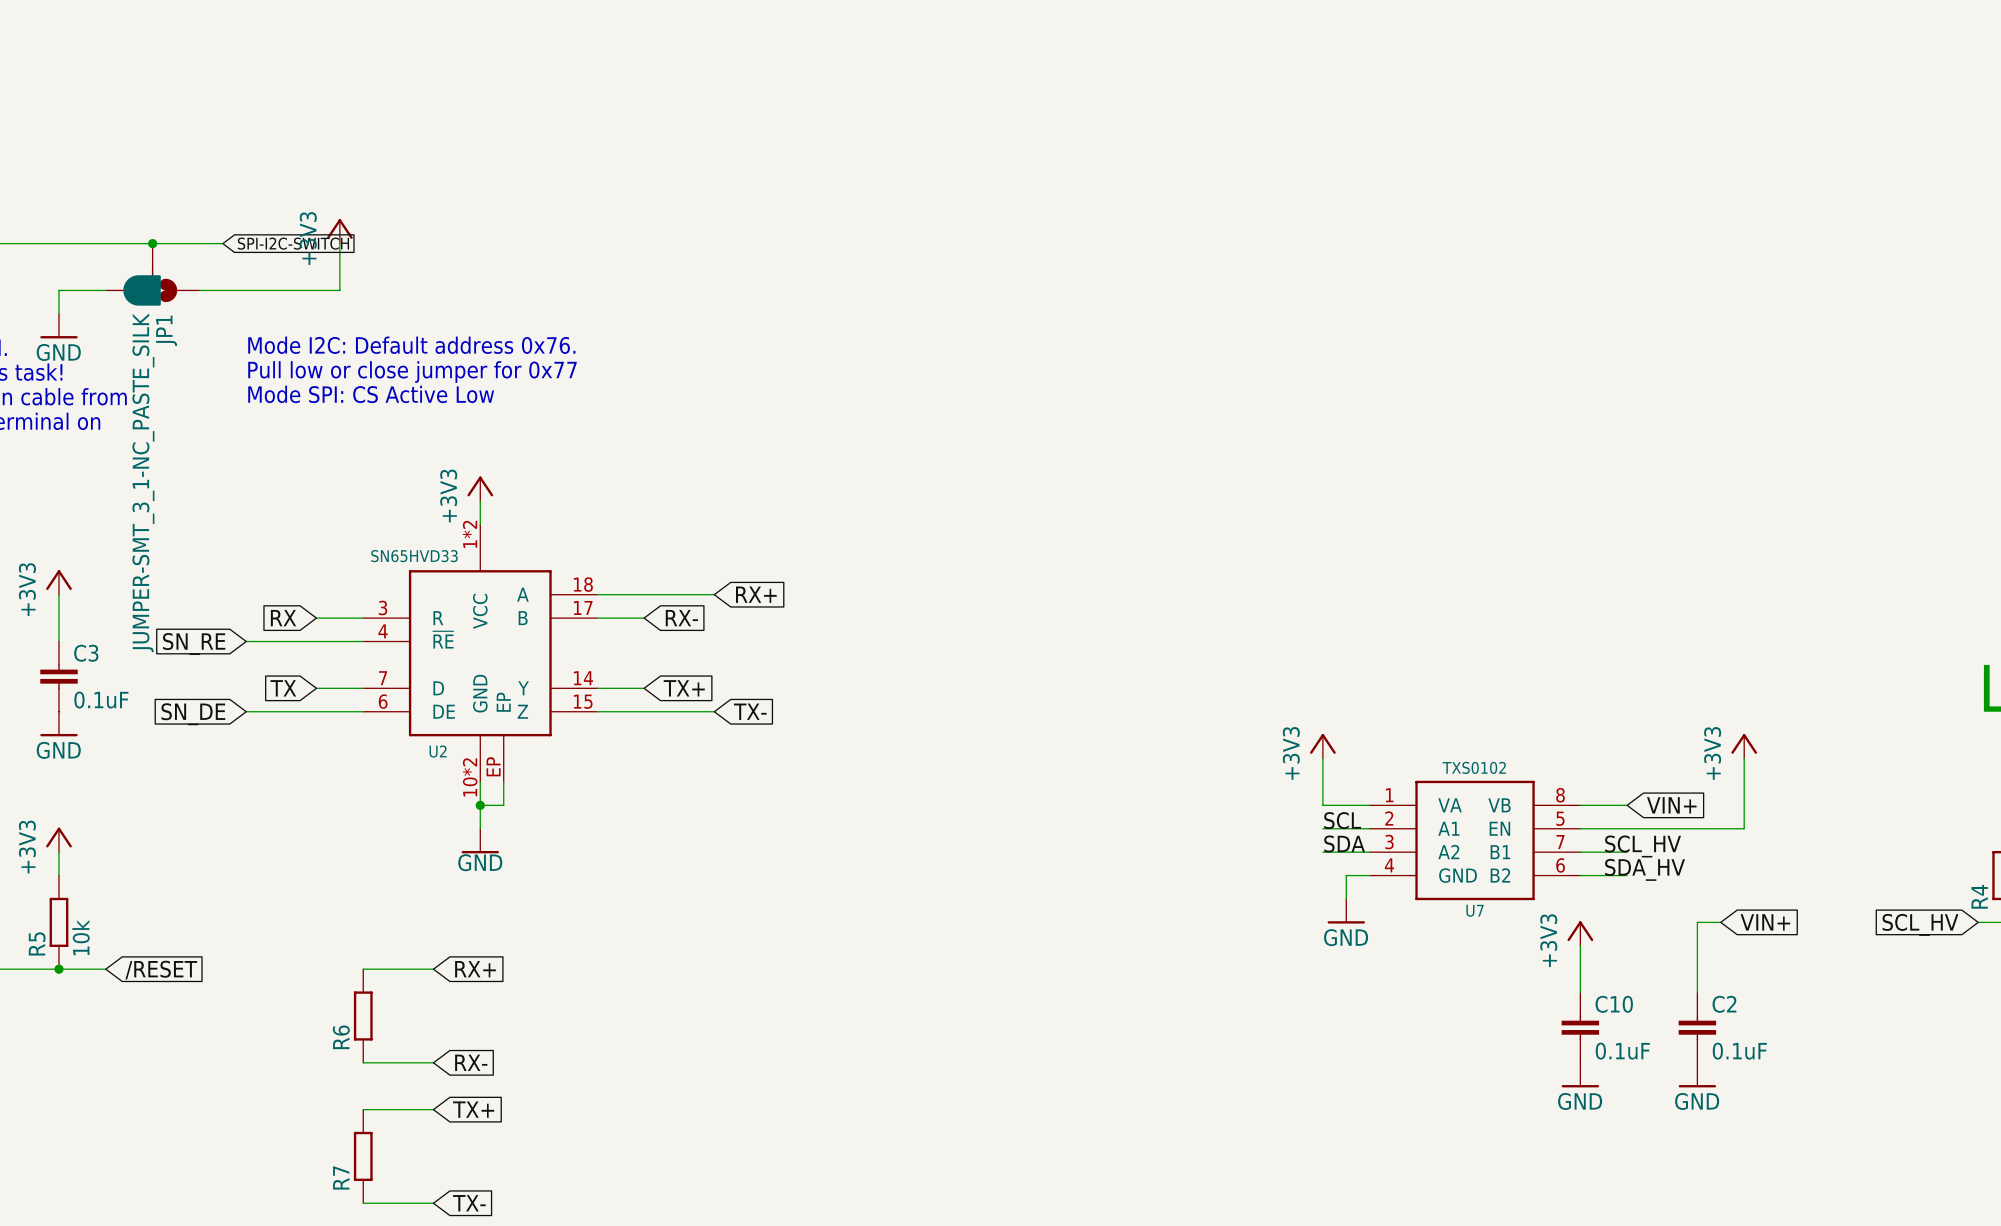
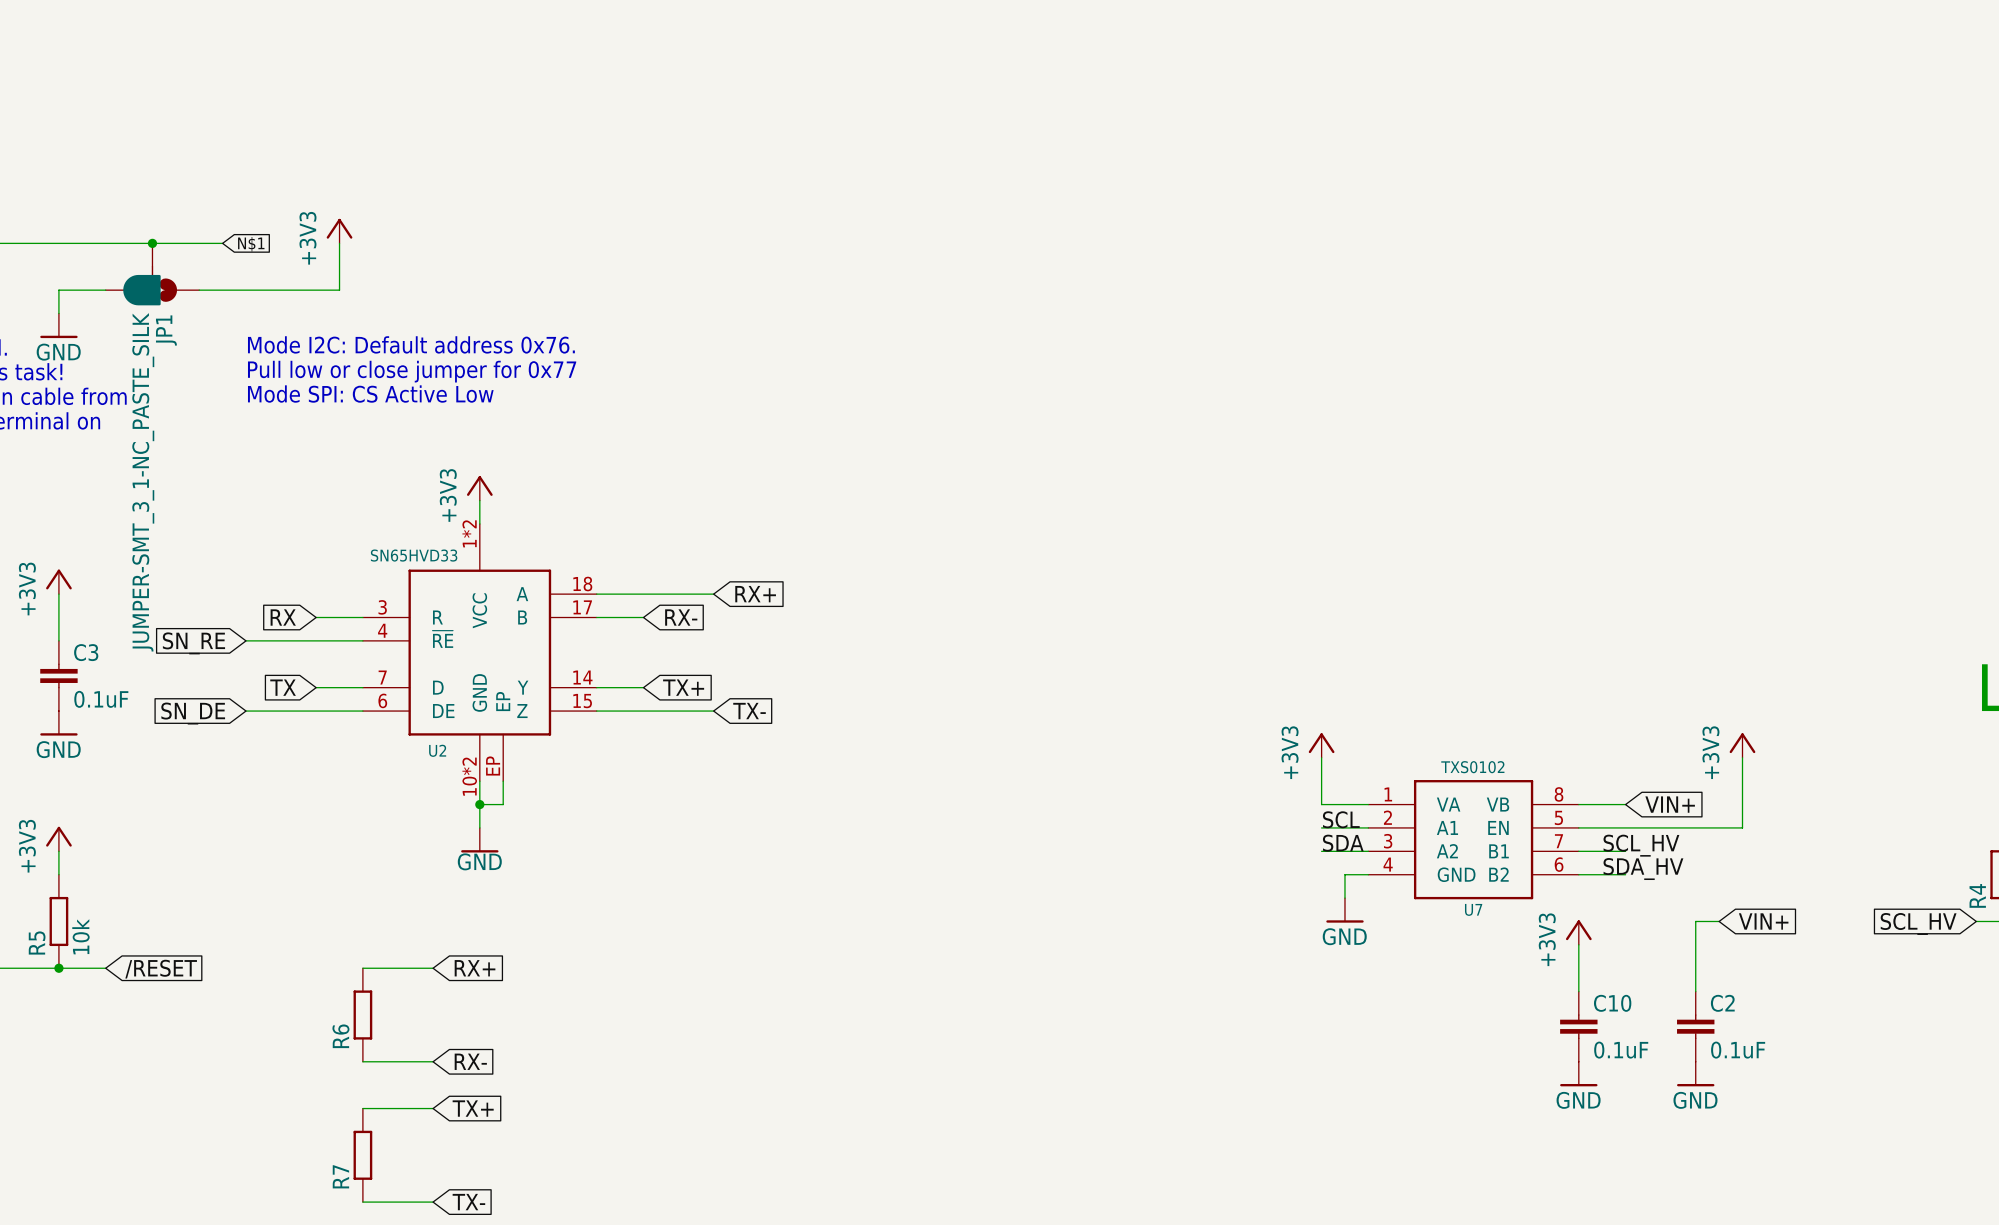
global label: SPI-I2C-SWITCH (293, 243) -> N$1 (251, 244)

